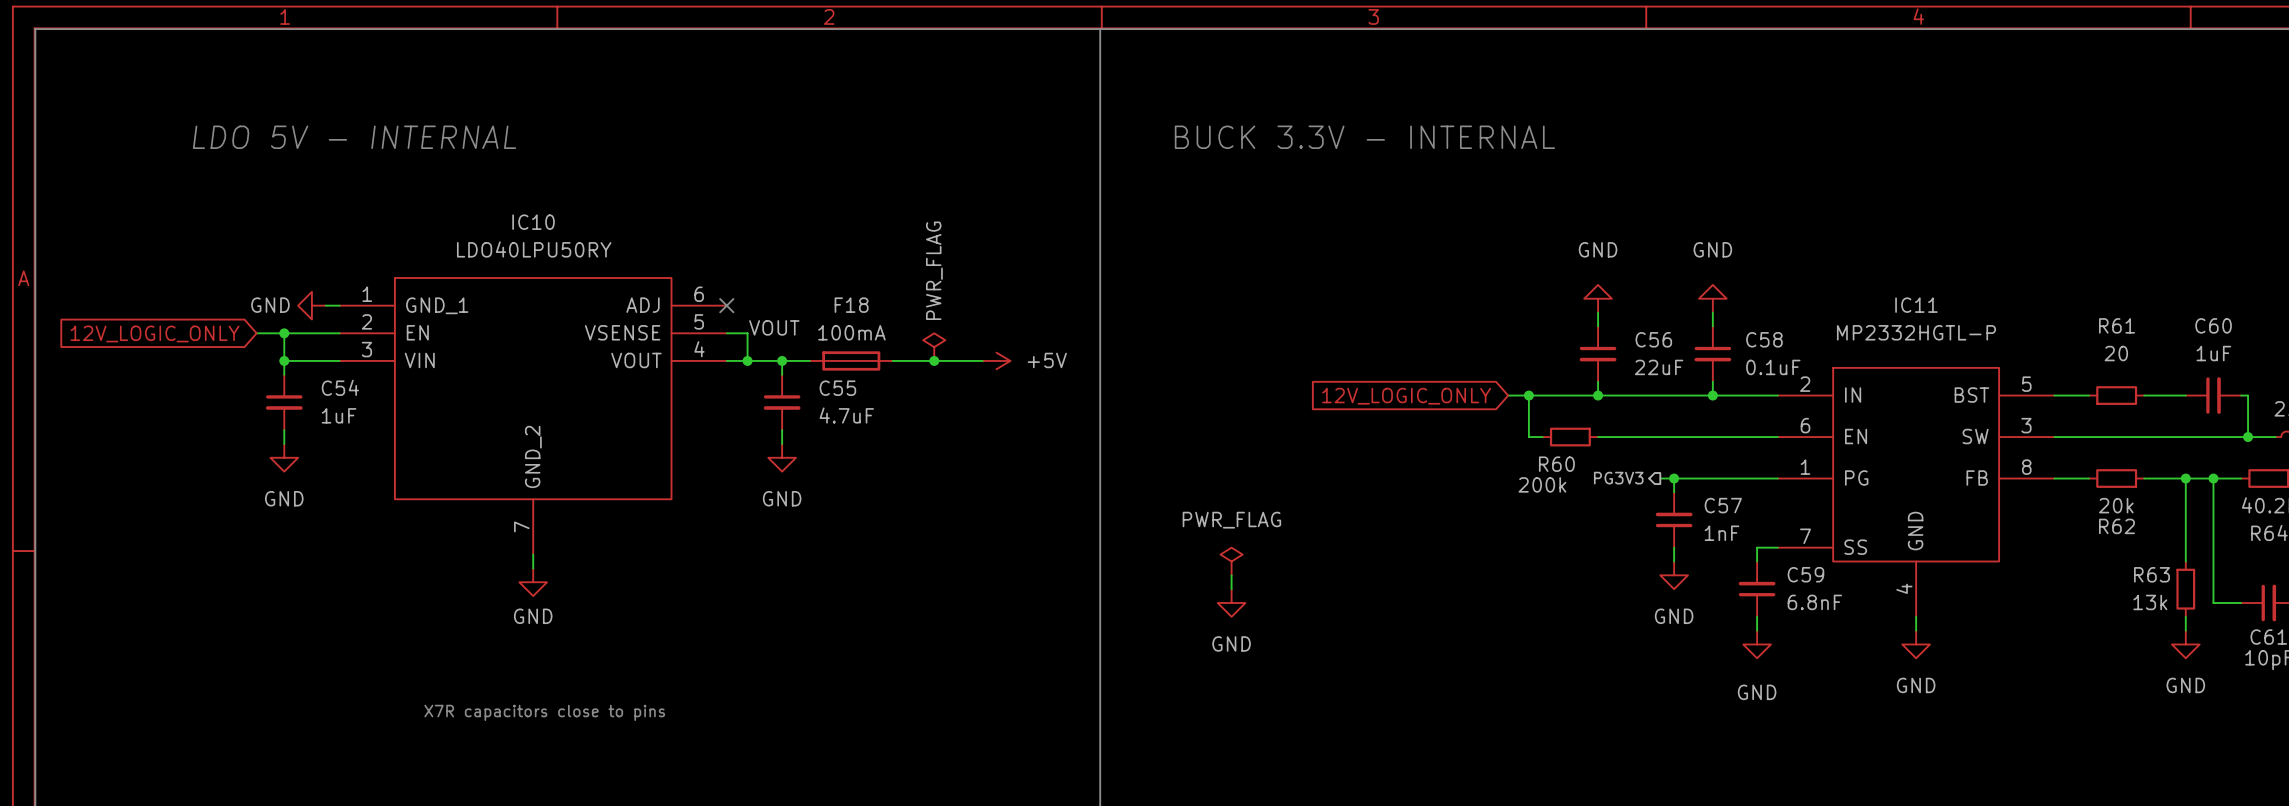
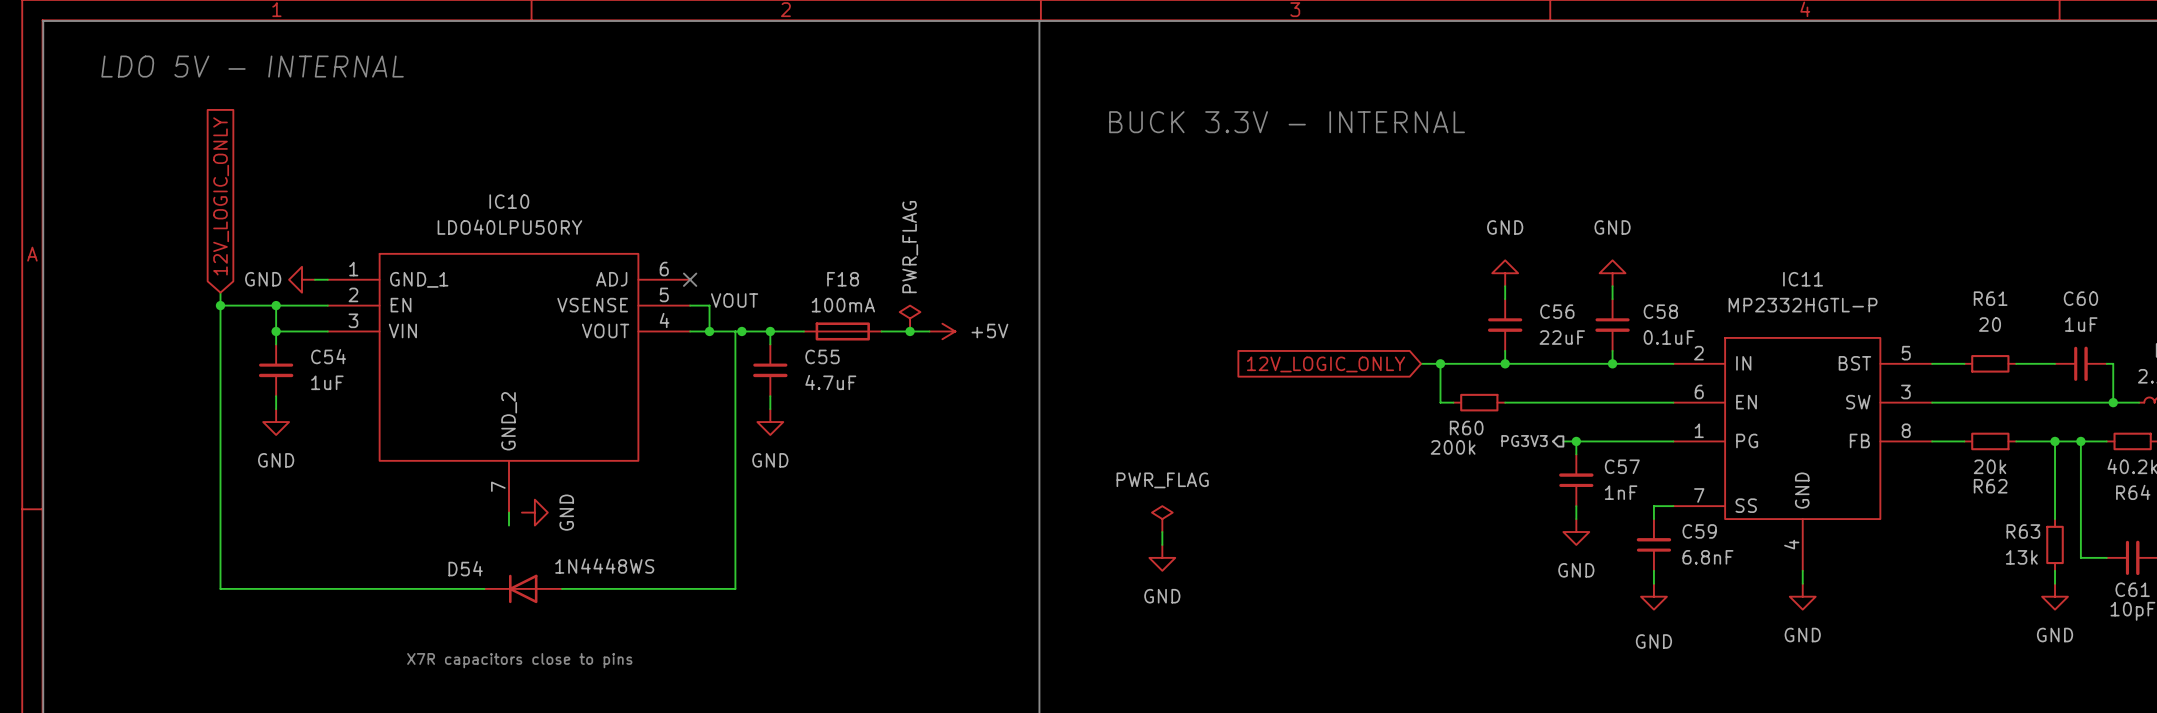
text position: LDO 5V - INTERNAL (354, 137) -> LDO 5V - INTERNAL (252, 66)
wire: none -> (220, 292) (220, 588) (484, 588)
global label rotation: 0° (155, 333) -> 90° clockwise (221, 196)
wire: none -> (220, 305) (250, 305)
junction: none -> (220, 305)
power symbol position: PWR_FLAG (934, 347) -> PWR_FLAG (910, 318)
wire: none -> (735, 331) (735, 588) (562, 588)
wire: (782, 360) (782, 374) -> (770, 331) (770, 344)
junction: none -> (770, 331)
F18 position: (851, 360) -> (842, 331)
junction position: (934, 360) -> (910, 331)
C55 position: (782, 402) -> (770, 370)
wire: (782, 430) (782, 443) -> (770, 396) (770, 409)
power symbol position: GND (782, 457) -> GND (770, 422)
power symbol rotation: 0° (533, 582) -> 90° counterclockwise (534, 512)
power symbol position: GND (533, 582) -> GND (534, 512)
D54: none -> 1N4448WS (523, 588)

